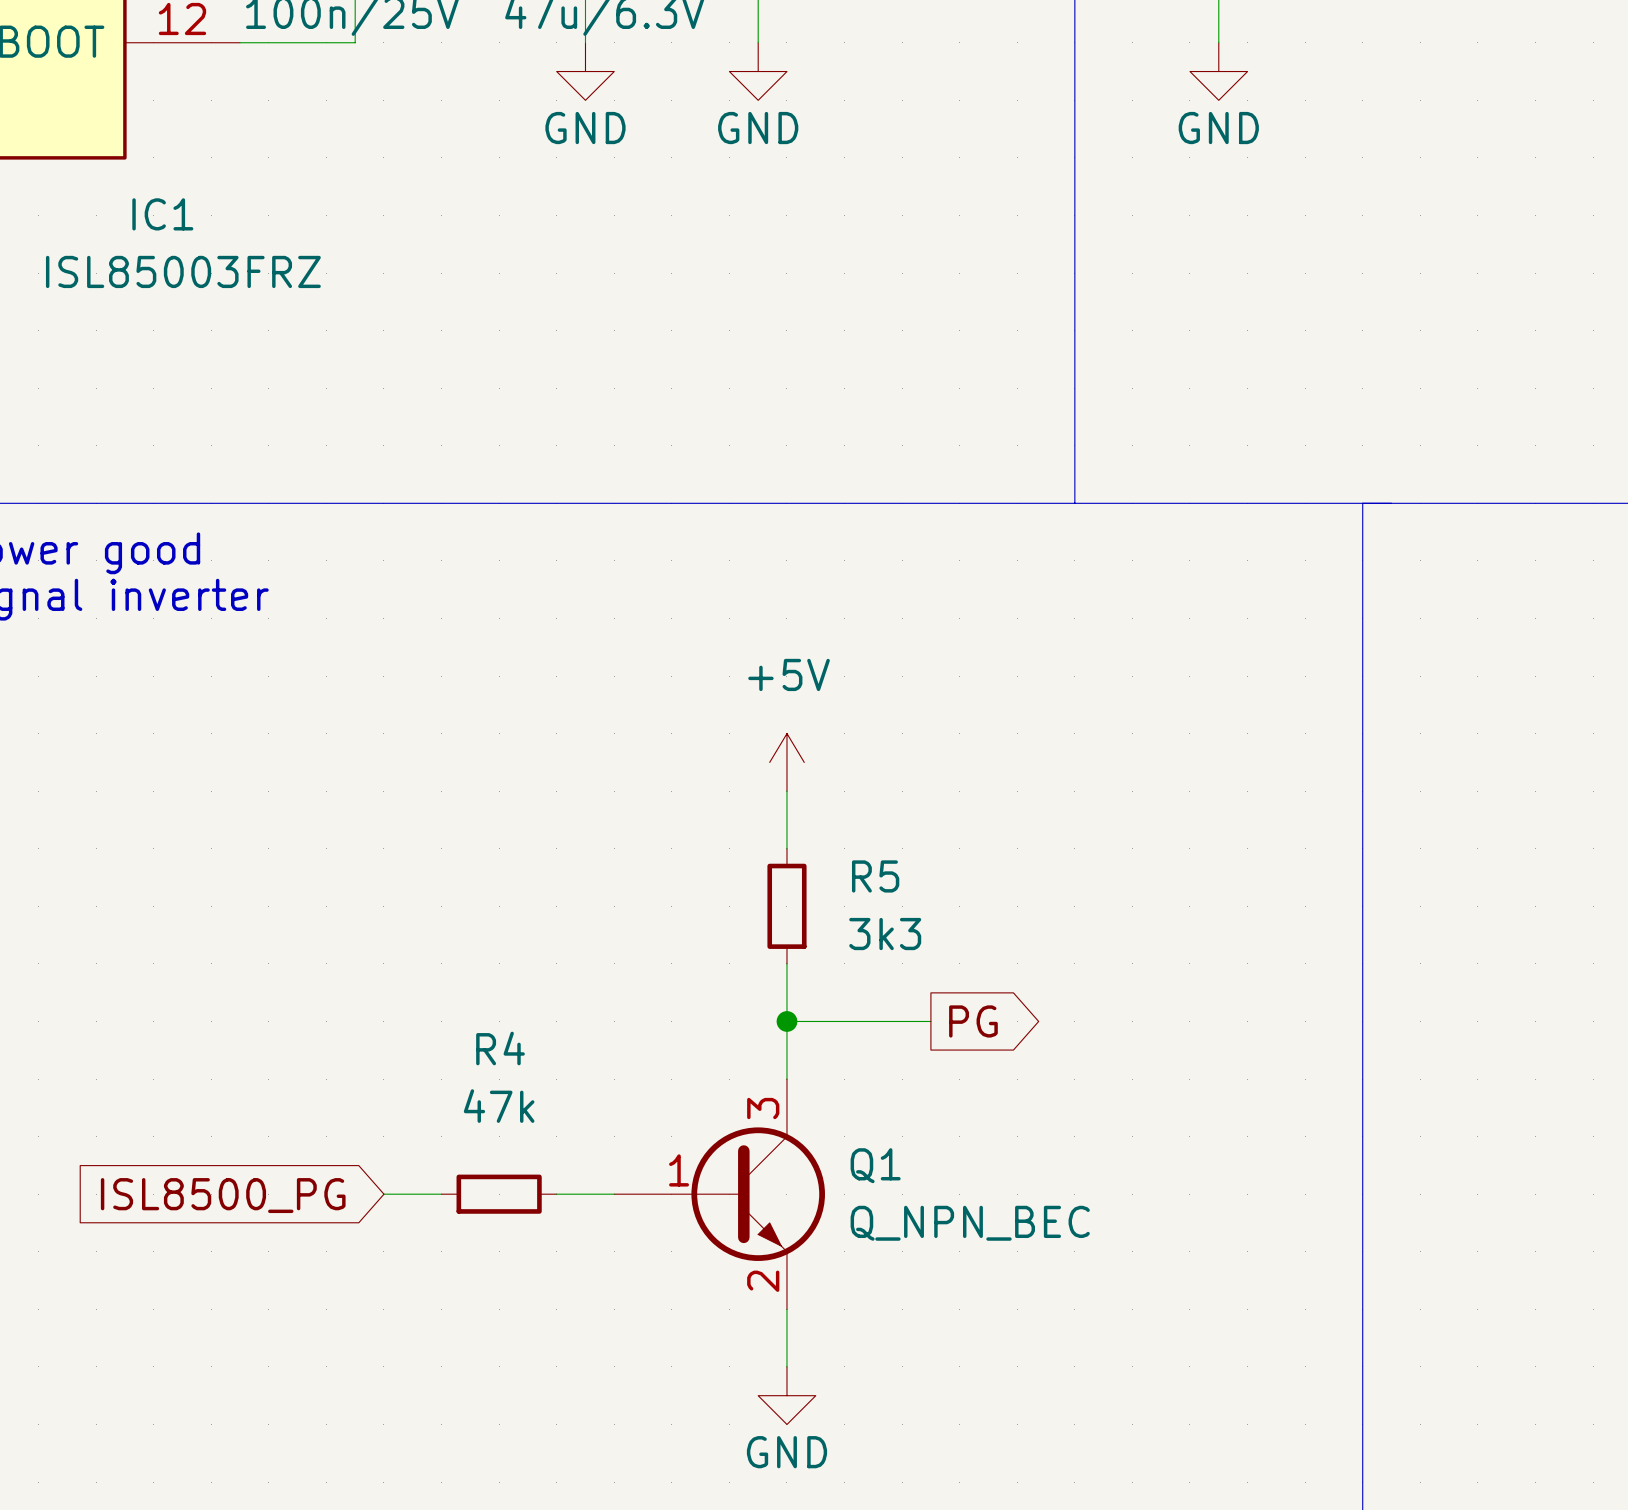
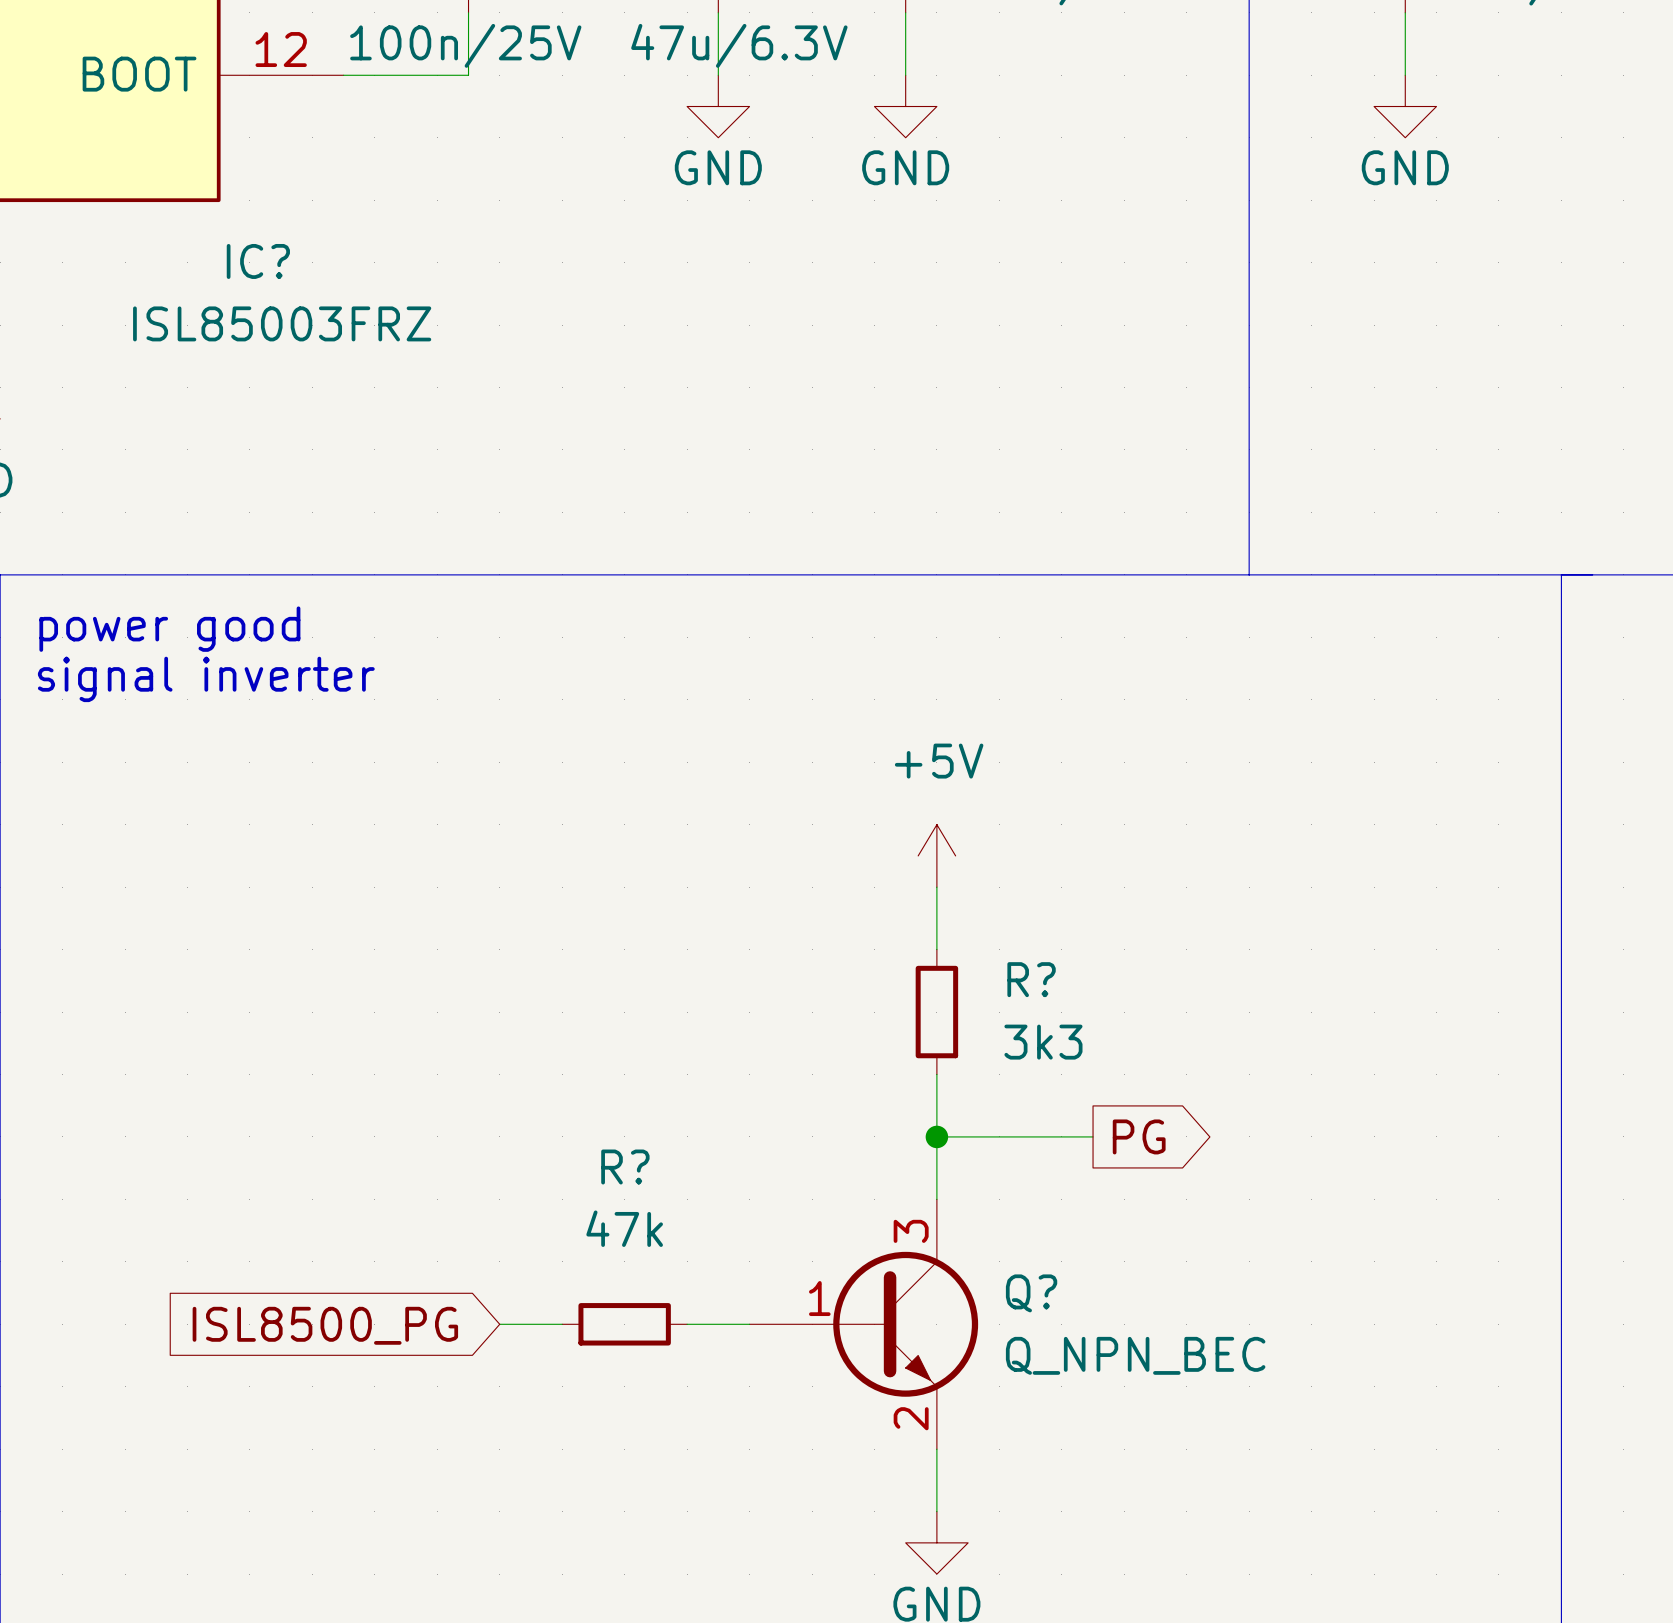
IC1 name: IC1 (162, 214) -> IC? (258, 261)
R5 name: R5 (875, 876) -> R? (1031, 979)
R4 name: R4 (500, 1048) -> R? (625, 1167)
Q1 name: Q1 (875, 1165) -> Q? (1031, 1293)

